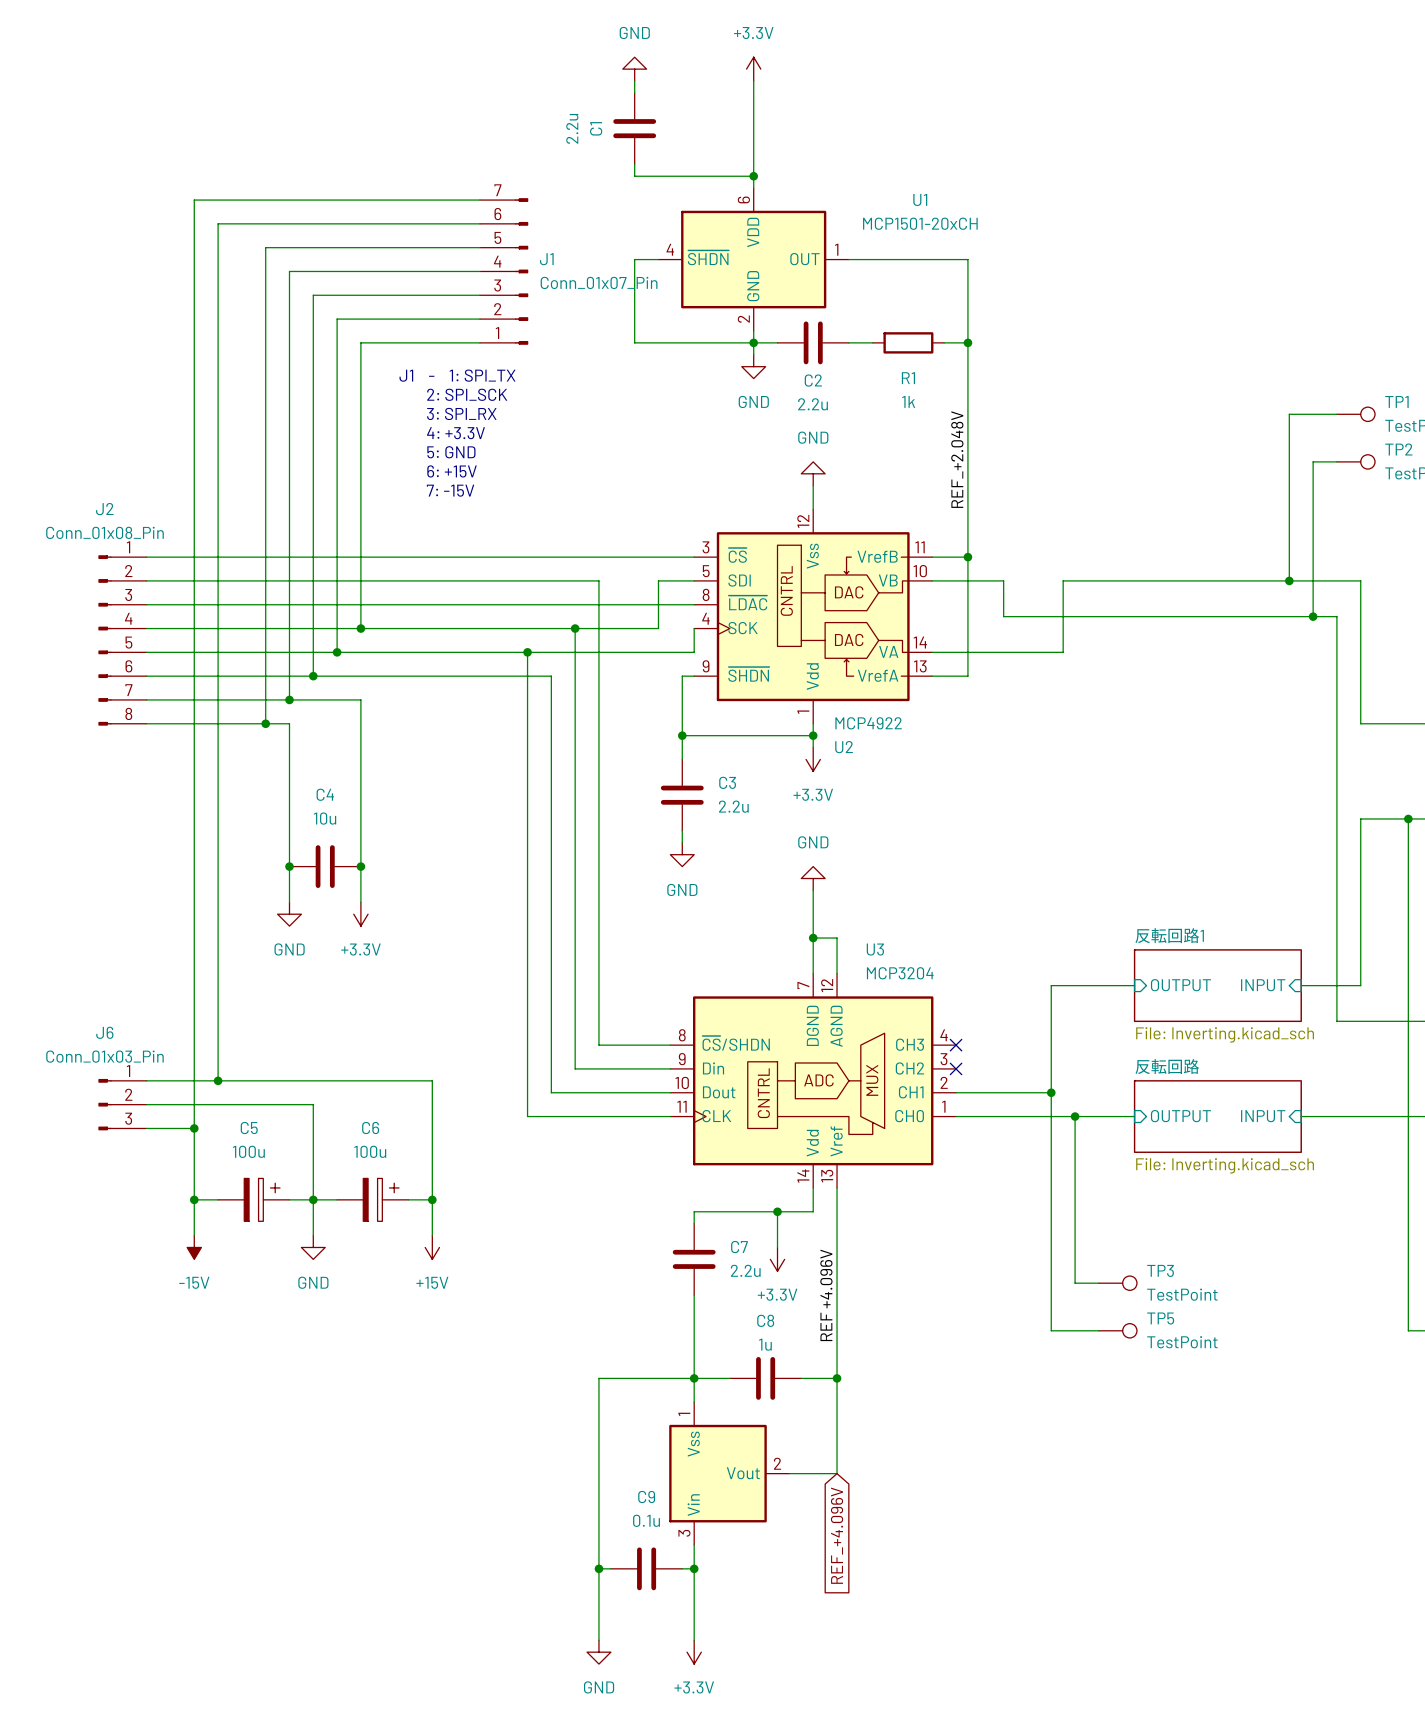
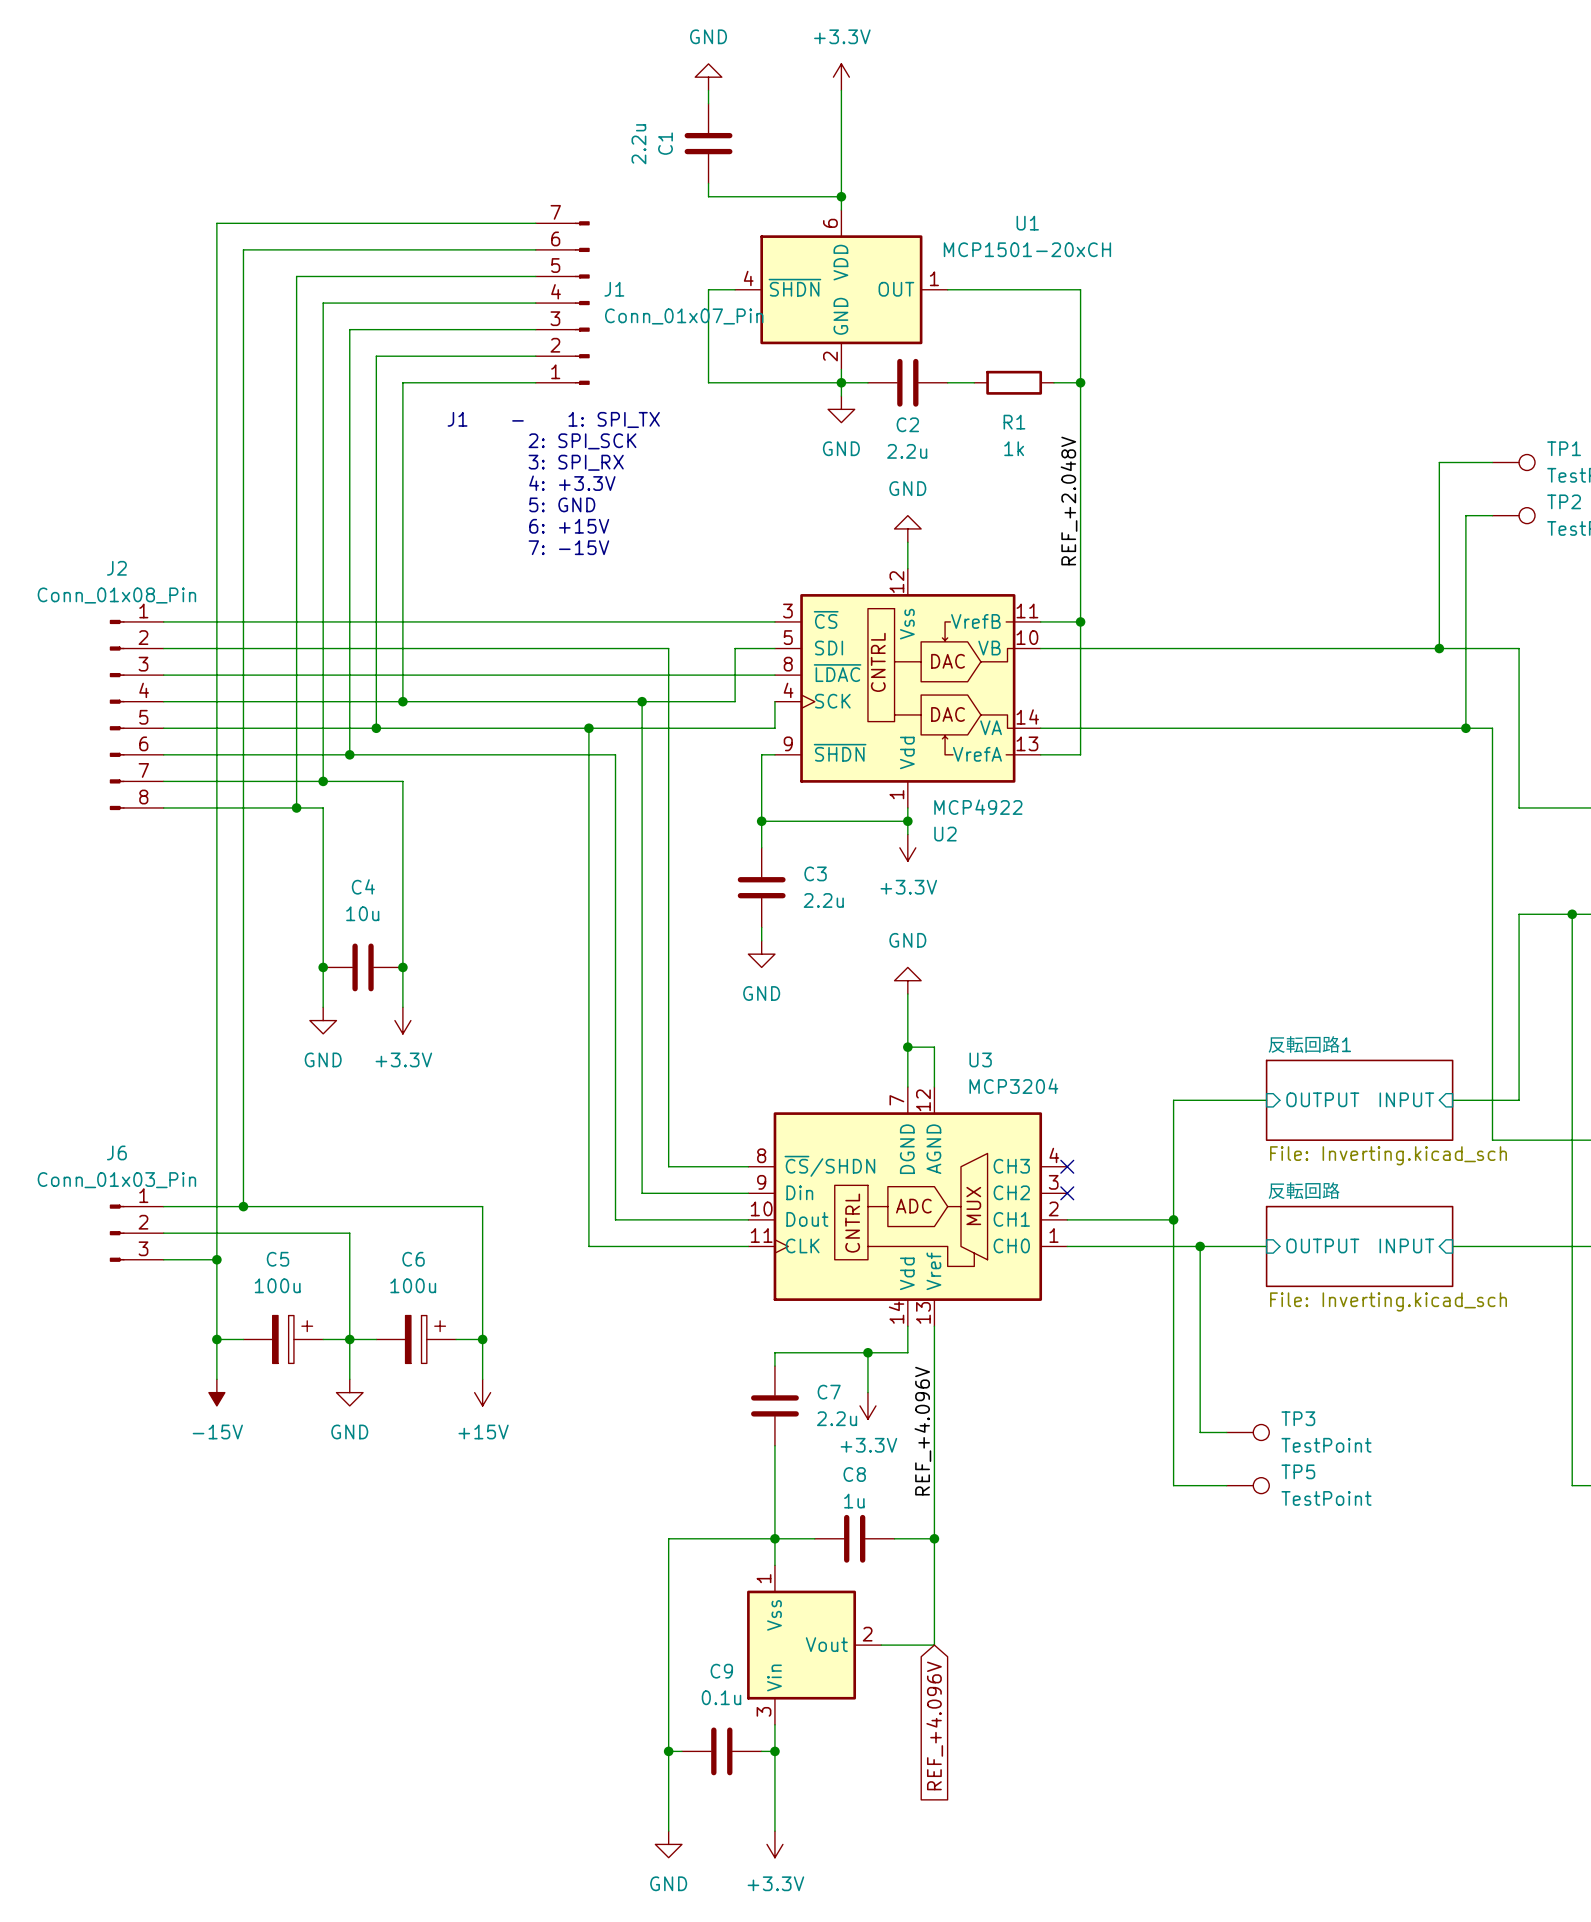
wire: (1003, 580) (1003, 616) (1336, 616) (1336, 652) -> (1186, 728) (1492, 728)
wire: (1063, 580) (1063, 652) -> (1186, 648) (1120, 648)
wire: none -> (1465, 688) (1465, 728)
junction position: (1313, 616) -> (1465, 728)
label: REF +4.096V (826, 1295) -> REF_+4.096V (922, 1431)

